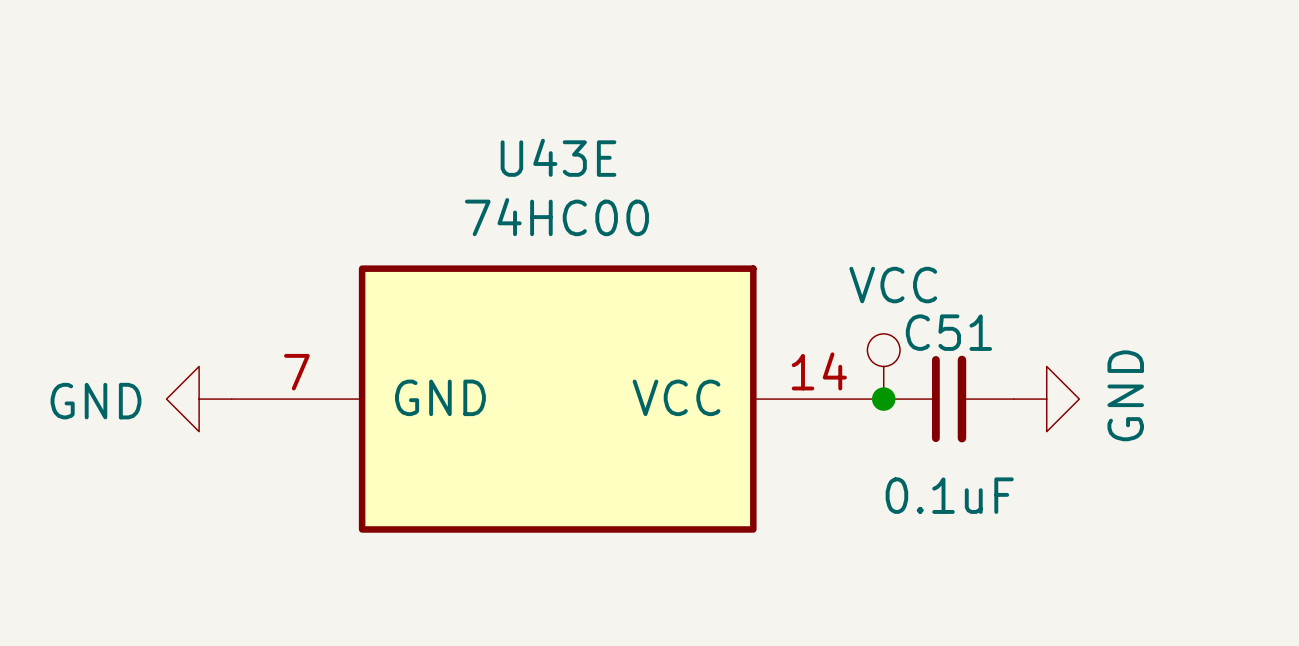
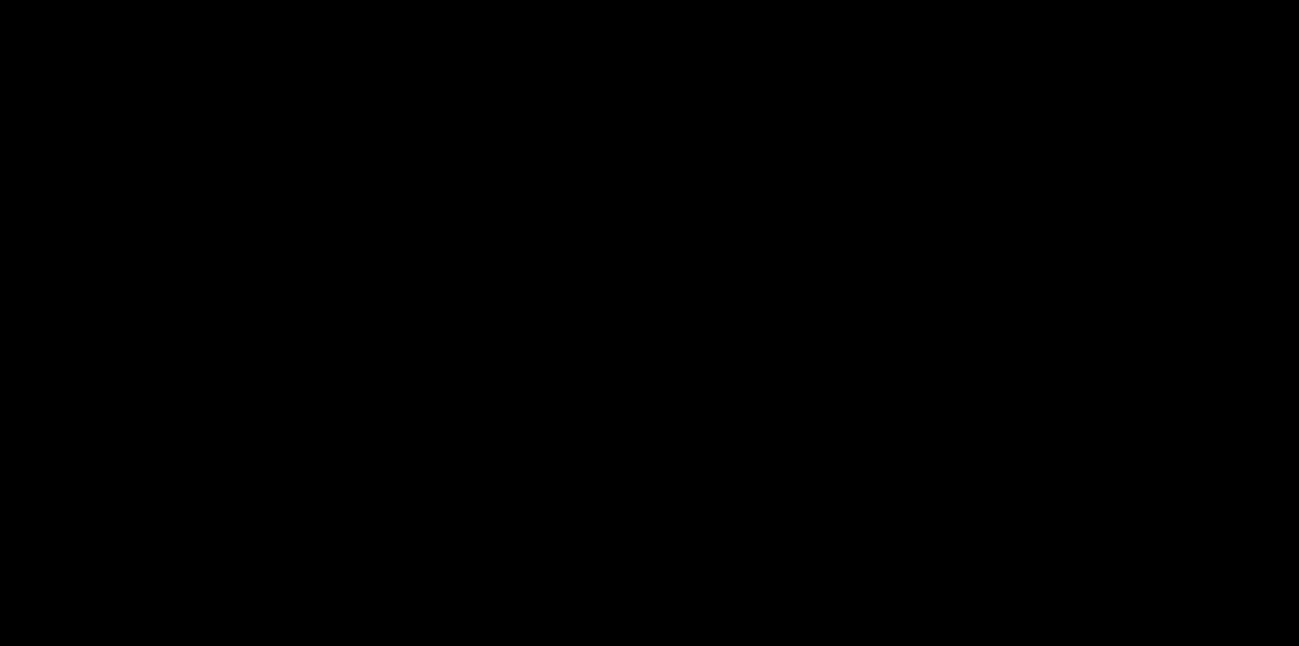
power symbol: VCC (883, 366) -> none
power symbol: GND (199, 399) -> none
U43E: 74HC00 (557, 399) -> none
junction: (883, 399) -> none
C51: 0.1uF (948, 399) -> none
power symbol: GND (1046, 399) -> none

